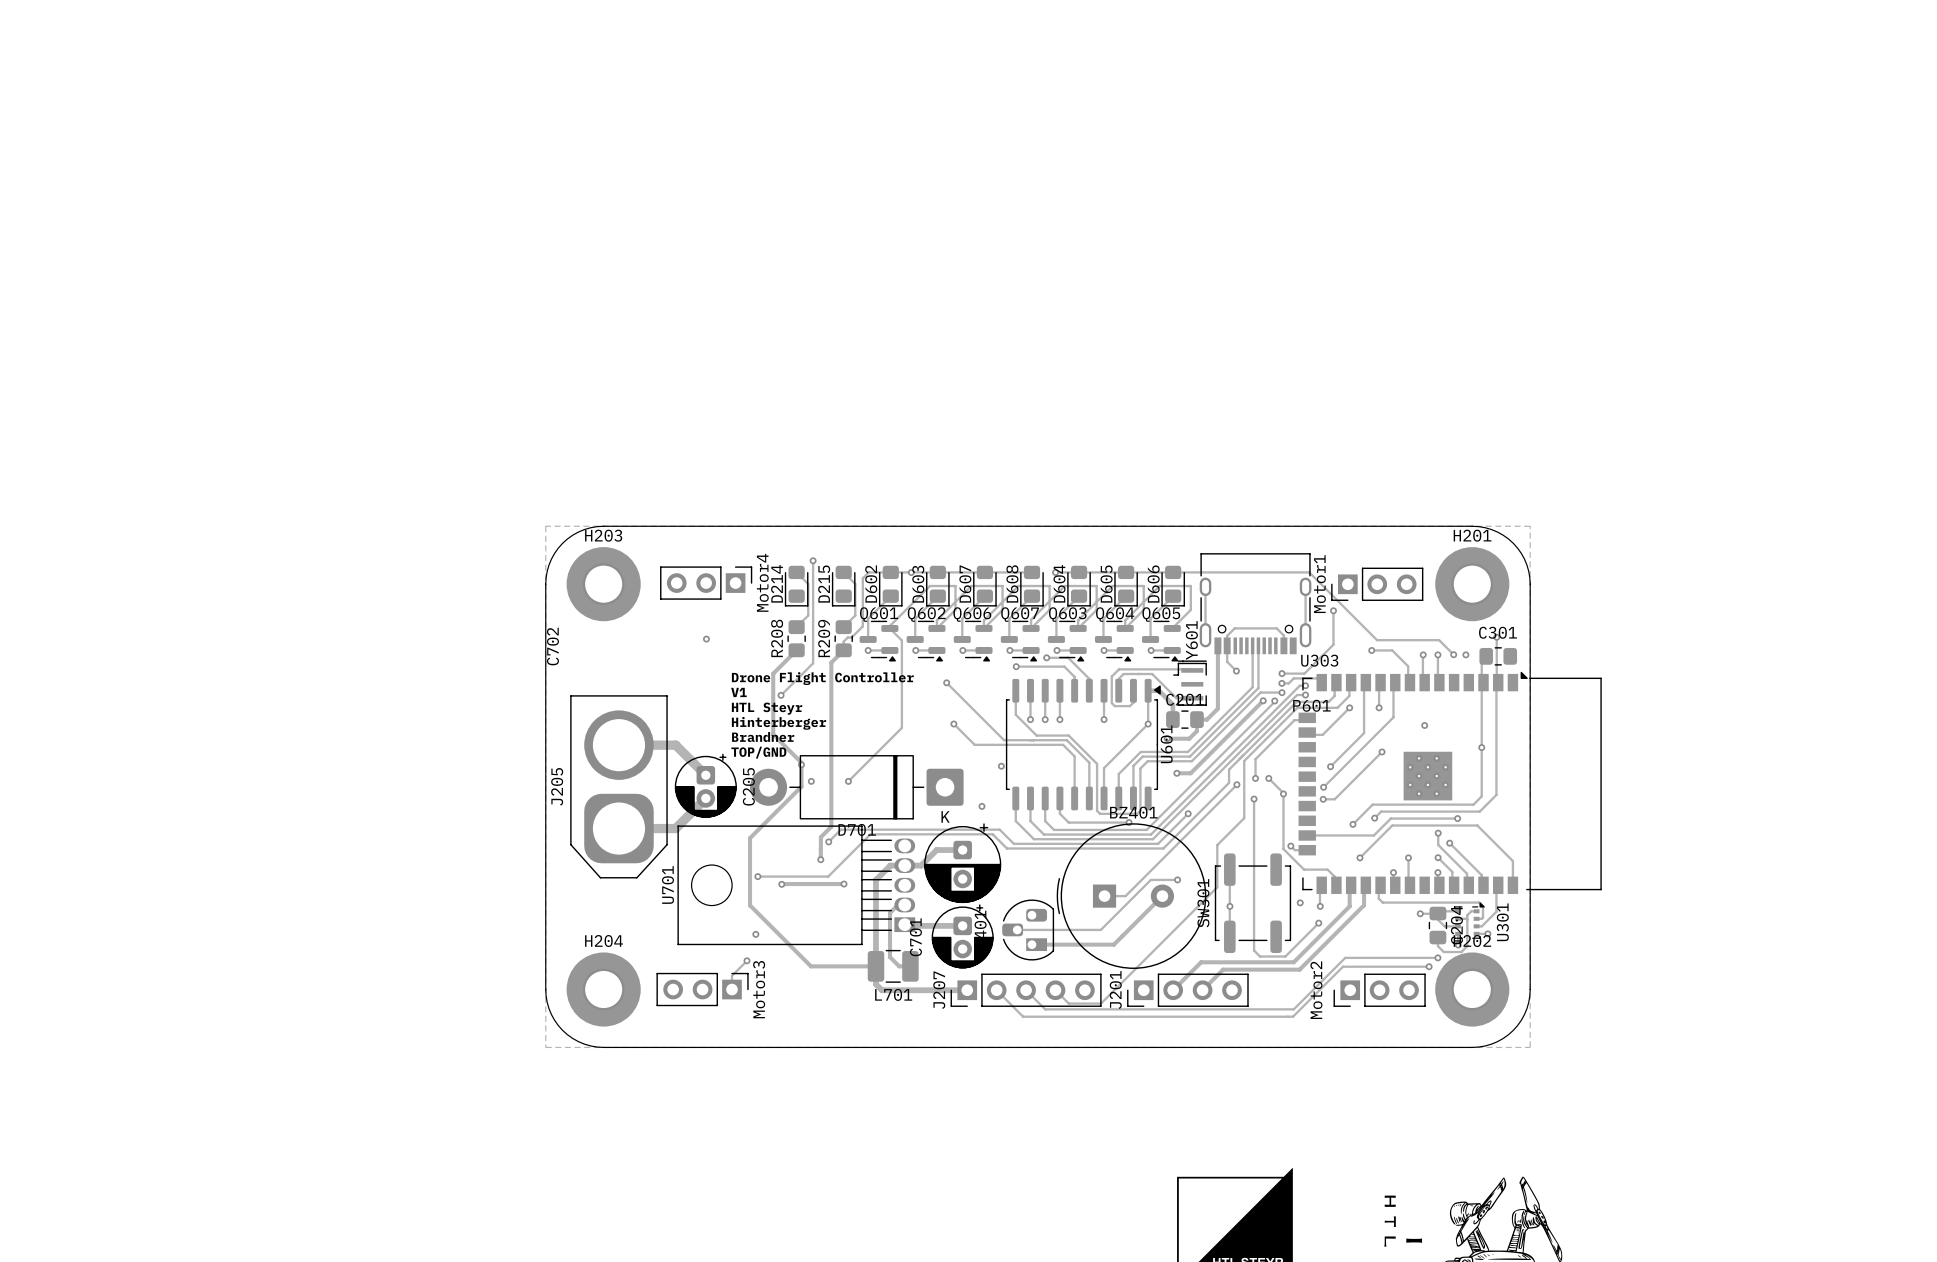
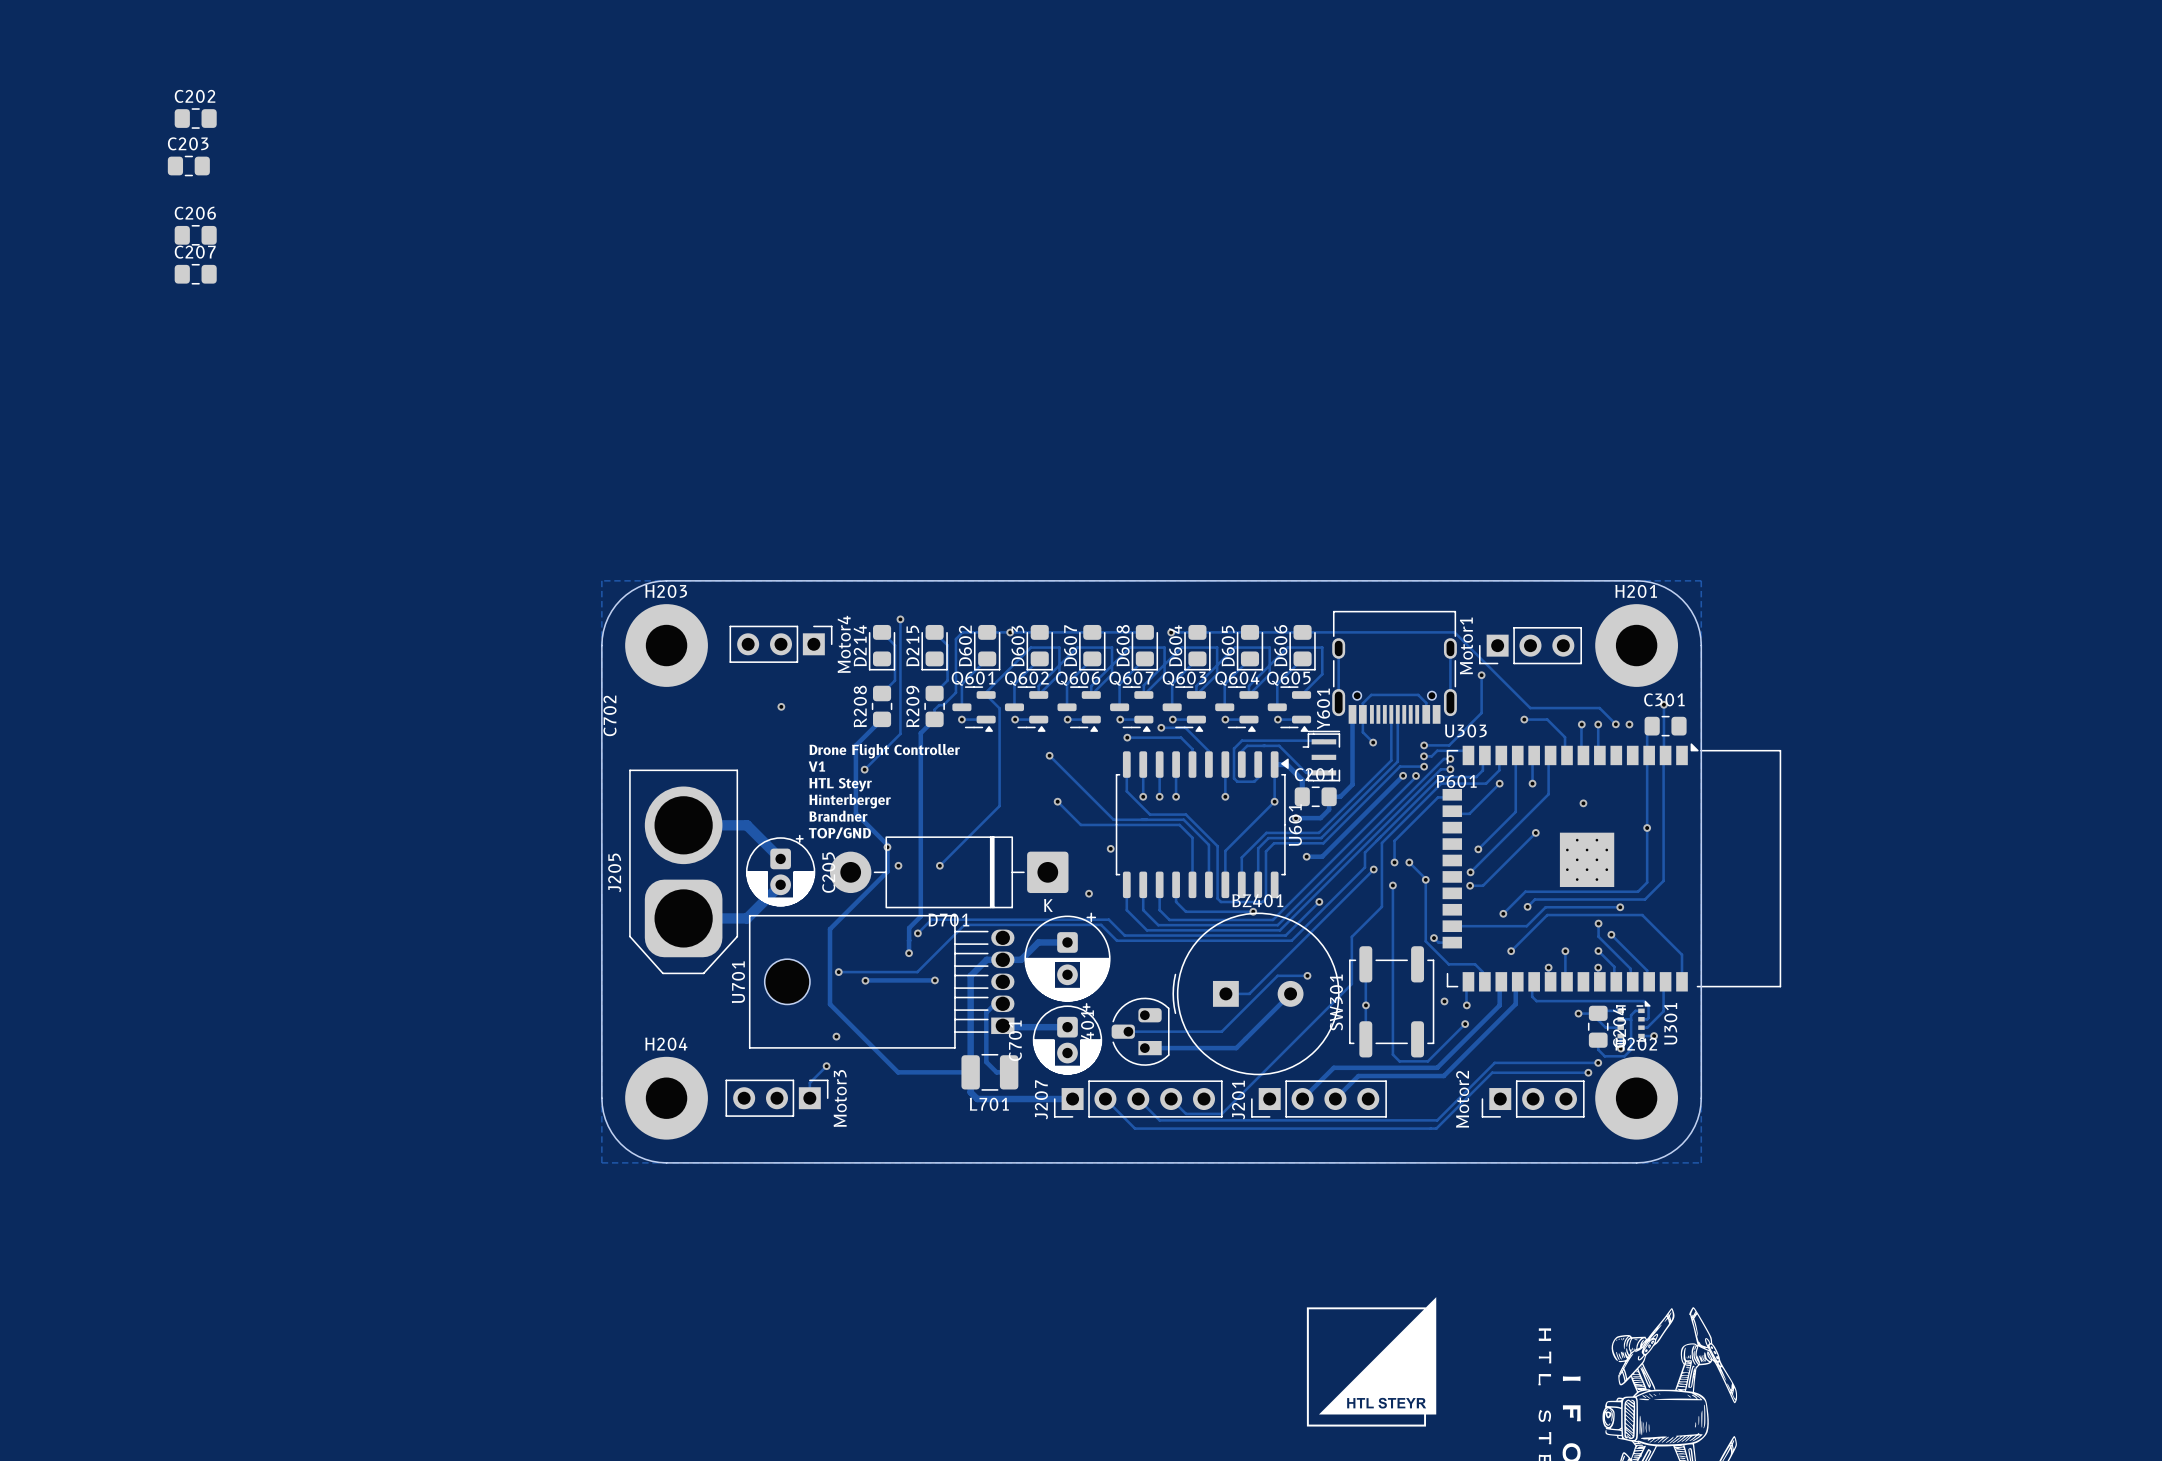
C202: none -> (195, 118)
C203: none -> (188, 166)
C206: none -> (195, 235)
C207: none -> (195, 274)

